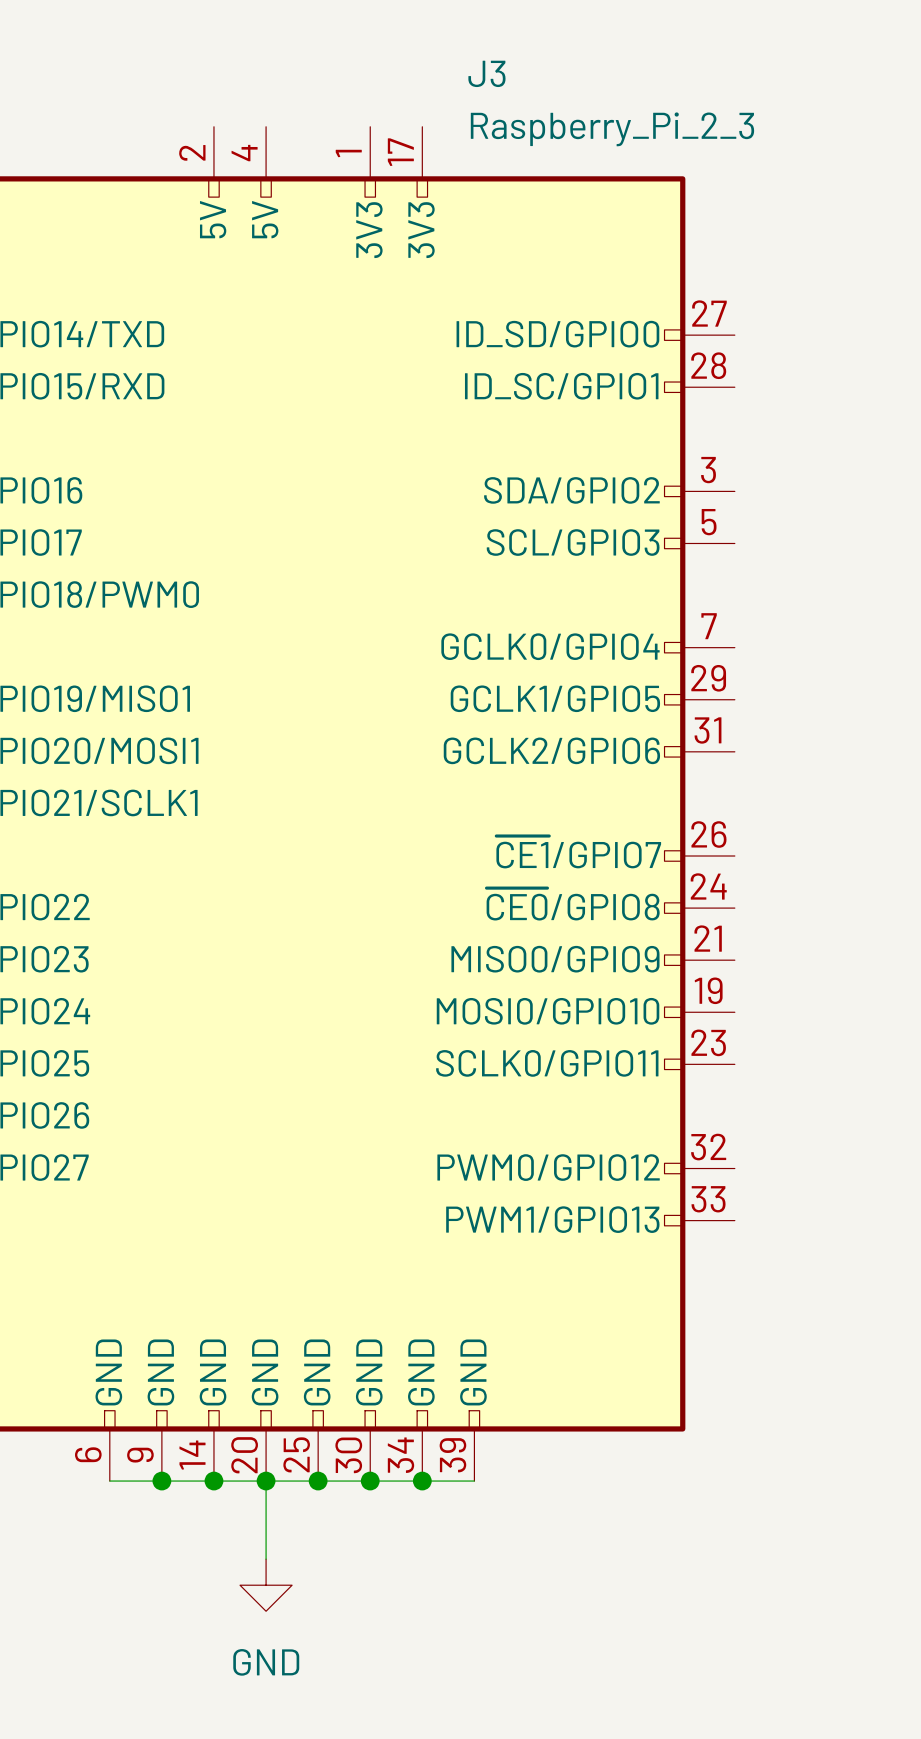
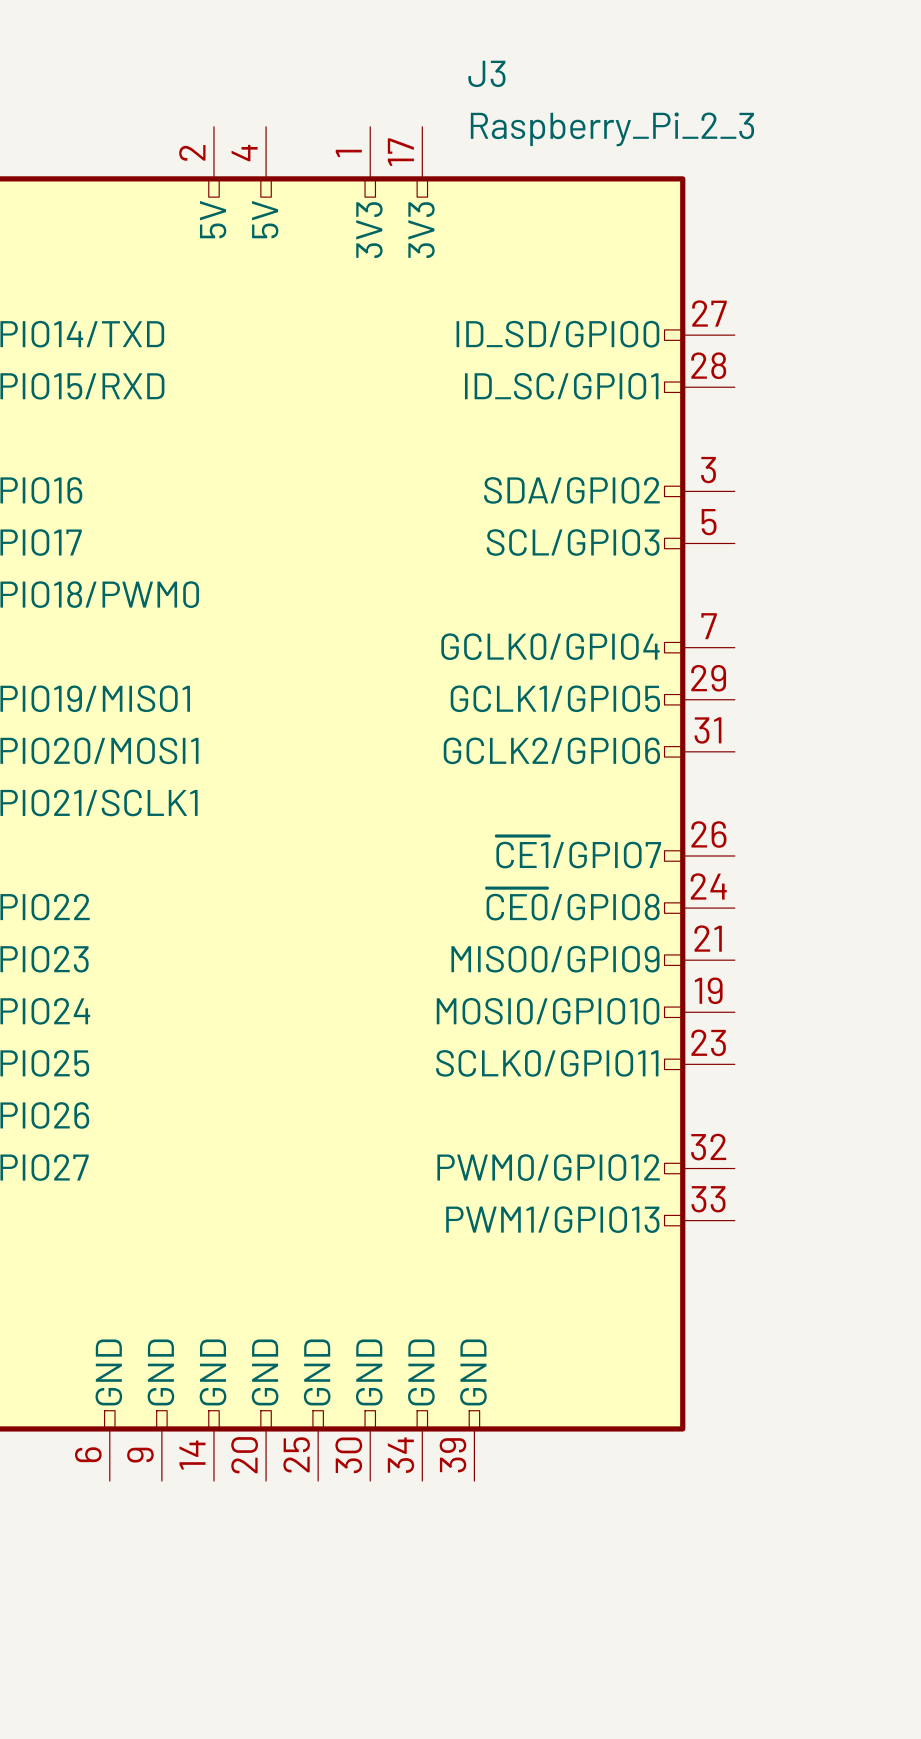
wire: (109, 1481) (474, 1481) -> none
junction: (161, 1481) -> none
junction: (213, 1481) -> none
wire: (266, 1481) (266, 1559) -> none
junction: (266, 1481) -> none
junction: (318, 1481) -> none
junction: (370, 1481) -> none
junction: (422, 1481) -> none
power symbol: GND (266, 1585) -> none

